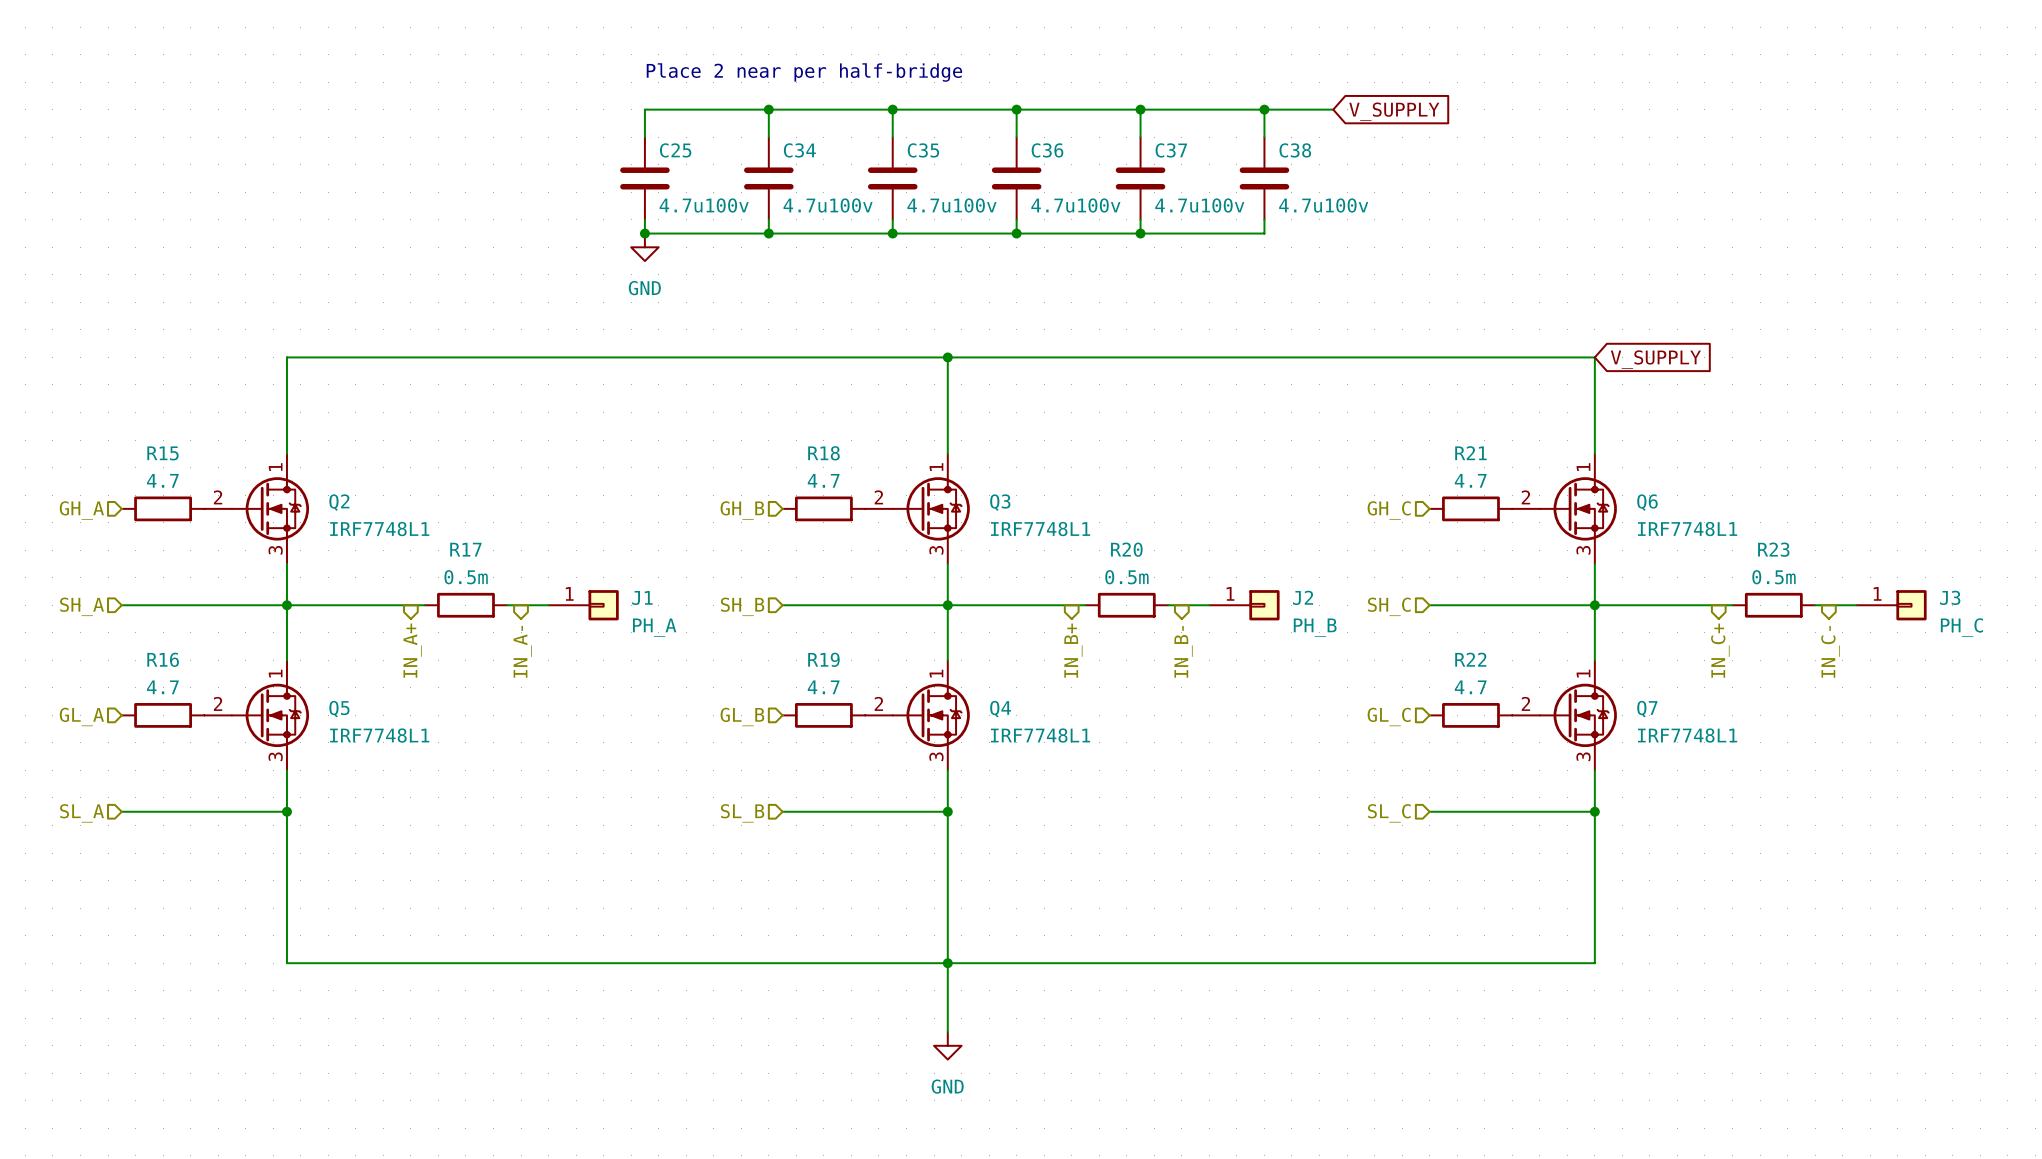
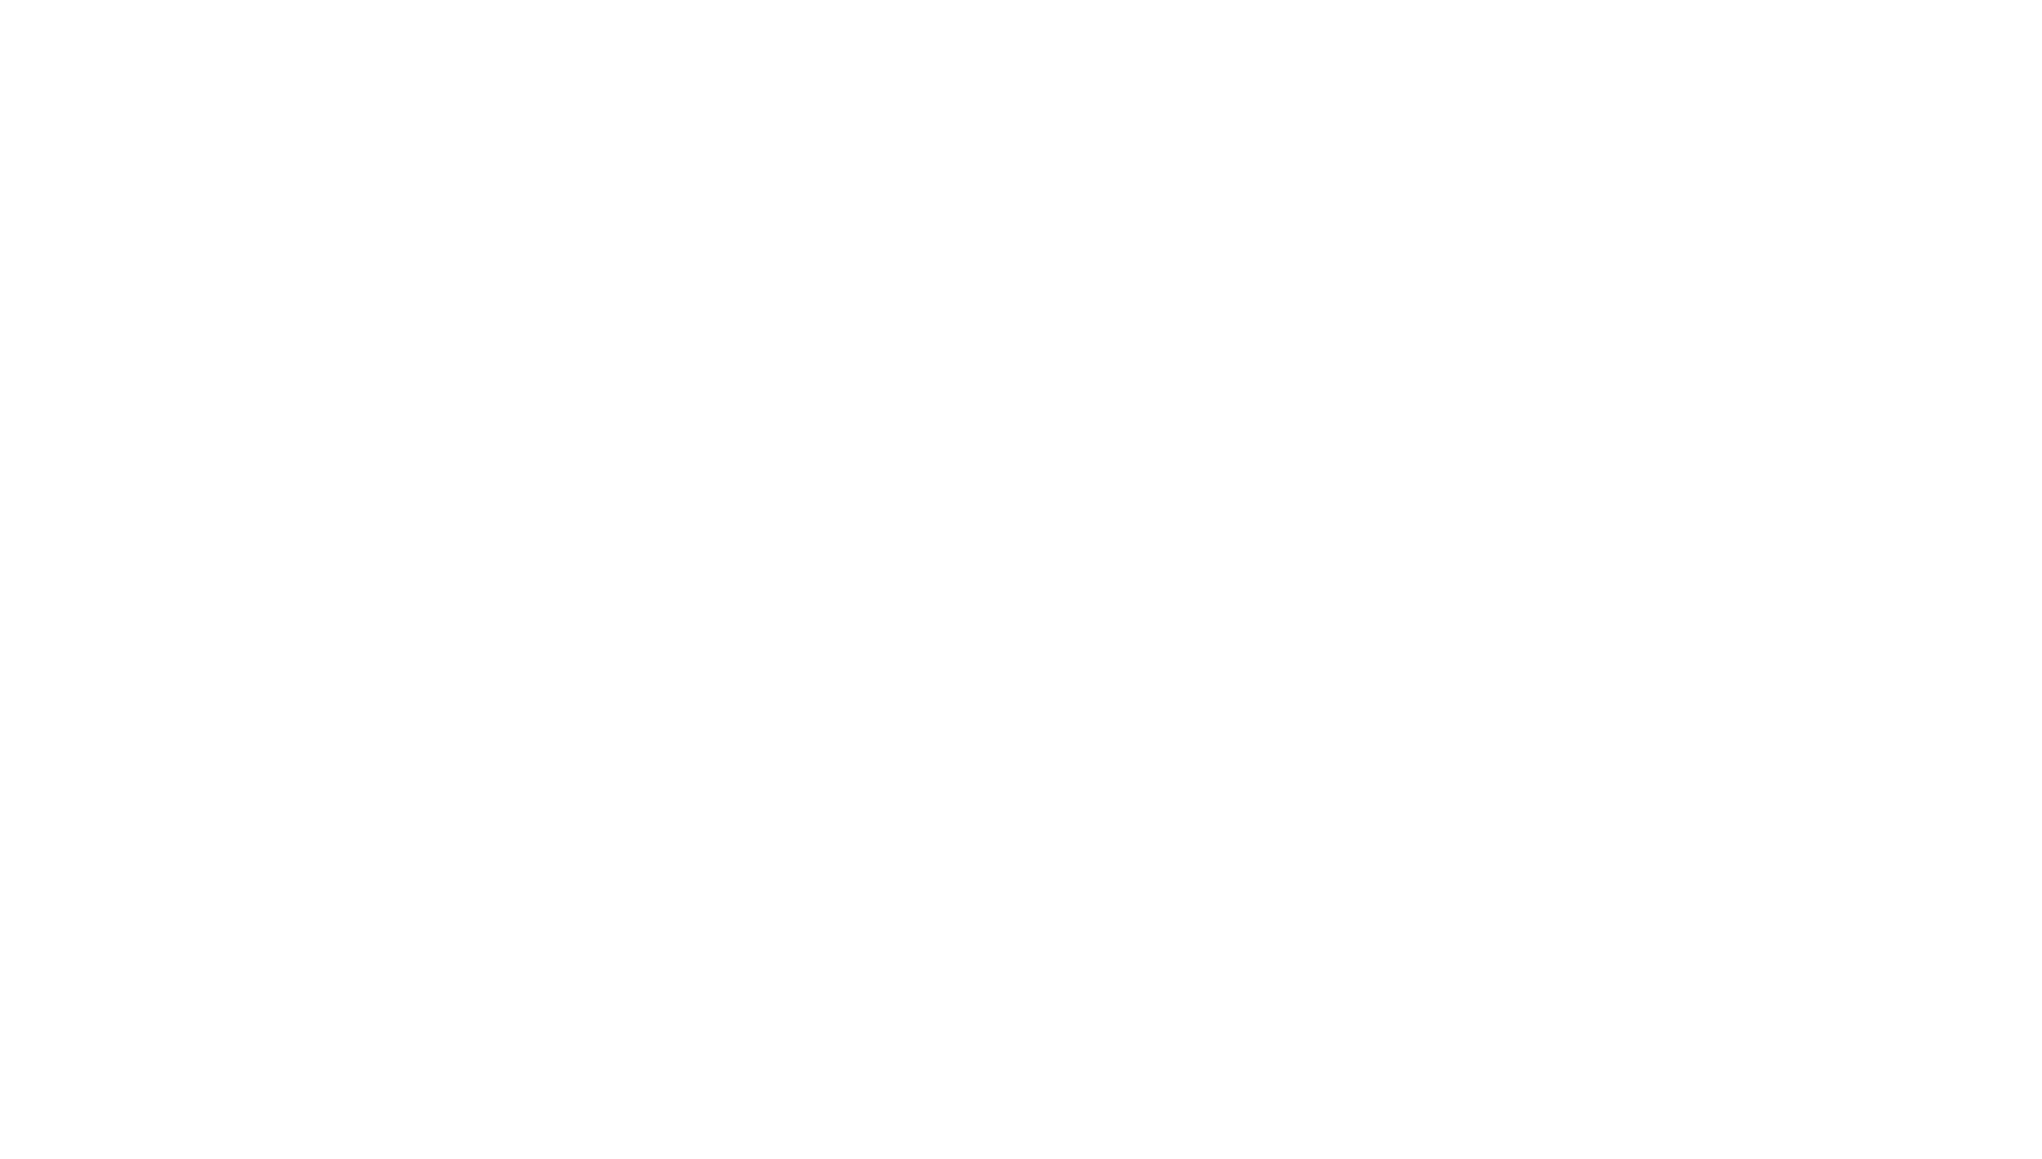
text: Place 2 near per half-bridge (804, 72) -> none
wire: (768, 109) (768, 137) -> none
junction: (768, 109) -> none
wire: (892, 109) (892, 137) -> none
junction: (892, 109) -> none
wire: (1016, 109) (1016, 137) -> none
junction: (1016, 109) -> none
wire: (1140, 109) (1140, 137) -> none
junction: (1140, 109) -> none
wire: (1264, 109) (1264, 137) -> none
junction: (1264, 109) -> none
wire: (1333, 109) (644, 109) (644, 137) -> none
global label: V_SUPPLY (1394, 111) -> none
C25: 4.7u100v (644, 178) -> none
C34: 4.7u100v (768, 178) -> none
C35: 4.7u100v (892, 178) -> none
C36: 4.7u100v (1016, 178) -> none
C37: 4.7u100v (1140, 178) -> none
C38: 4.7u100v (1264, 178) -> none
wire: (644, 219) (644, 233) (1264, 233) (1264, 219) -> none
wire: (768, 219) (768, 233) -> none
wire: (892, 219) (892, 233) -> none
wire: (1016, 219) (1016, 233) -> none
wire: (1140, 219) (1140, 233) -> none
junction: (644, 233) -> none
junction: (768, 233) -> none
junction: (892, 233) -> none
junction: (1016, 233) -> none
junction: (1140, 233) -> none
power symbol: GND (644, 247) -> none
wire: (947, 357) (947, 453) -> none
junction: (947, 357) -> none
global label: V_SUPPLY (1655, 359) -> none
wire: (286, 453) (286, 357) (1594, 357) (1594, 453) -> none
R15: 4.7 (163, 508) -> none
Q2: IRF7748L1 (256, 508) -> none
R18: 4.7 (823, 508) -> none
Q3: IRF7748L1 (917, 508) -> none
R21: 4.7 (1470, 508) -> none
Q6: IRF7748L1 (1564, 508) -> none
hierarchical label: GH_A (81, 510) -> none
hierarchical label: GH_B (742, 510) -> none
hierarchical label: GH_C (1389, 510) -> none
wire: (286, 563) (286, 660) -> none
wire: (947, 563) (947, 660) -> none
wire: (1594, 563) (1594, 660) -> none
wire: (121, 605) (424, 605) -> none
junction: (286, 605) -> none
R17: 0.5m (465, 605) -> none
wire: (507, 605) (548, 605) -> none
J1: PH_A (583, 605) -> none
wire: (782, 605) (1085, 605) -> none
junction: (947, 605) -> none
R20: 0.5m (1126, 605) -> none
wire: (1168, 605) (1209, 605) -> none
J2: PH_B (1244, 605) -> none
wire: (1429, 605) (1732, 605) -> none
junction: (1594, 605) -> none
R23: 0.5m (1773, 605) -> none
wire: (1815, 605) (1856, 605) -> none
J3: PH_C (1891, 605) -> none
hierarchical label: SH_A (82, 606) -> none
hierarchical label: SH_B (742, 606) -> none
hierarchical label: SH_C (1389, 606) -> none
hierarchical label: IN_A+ (412, 650) -> none
hierarchical label: IN_B+ (1073, 650) -> none
hierarchical label: IN_C+ (1720, 650) -> none
hierarchical label: IN_A- (522, 651) -> none
hierarchical label: IN_B- (1183, 651) -> none
hierarchical label: IN_C- (1830, 651) -> none
R16: 4.7 (163, 715) -> none
Q5: IRF7748L1 (256, 715) -> none
R19: 4.7 (823, 715) -> none
Q4: IRF7748L1 (917, 715) -> none
R22: 4.7 (1470, 715) -> none
Q7: IRF7748L1 (1564, 715) -> none
hierarchical label: GL_A (81, 716) -> none
hierarchical label: GL_B (742, 716) -> none
hierarchical label: GL_C (1389, 716) -> none
wire: (286, 770) (286, 963) (1594, 963) (1594, 770) -> none
wire: (947, 770) (947, 1032) -> none
wire: (121, 811) (286, 811) -> none
junction: (286, 811) -> none
wire: (782, 811) (947, 811) -> none
junction: (947, 811) -> none
wire: (1429, 811) (1594, 811) -> none
junction: (1594, 811) -> none
hierarchical label: SL_A (82, 813) -> none
hierarchical label: SL_B (742, 813) -> none
hierarchical label: SL_C (1389, 813) -> none
junction: (947, 963) -> none
power symbol: GND (947, 1045) -> none

